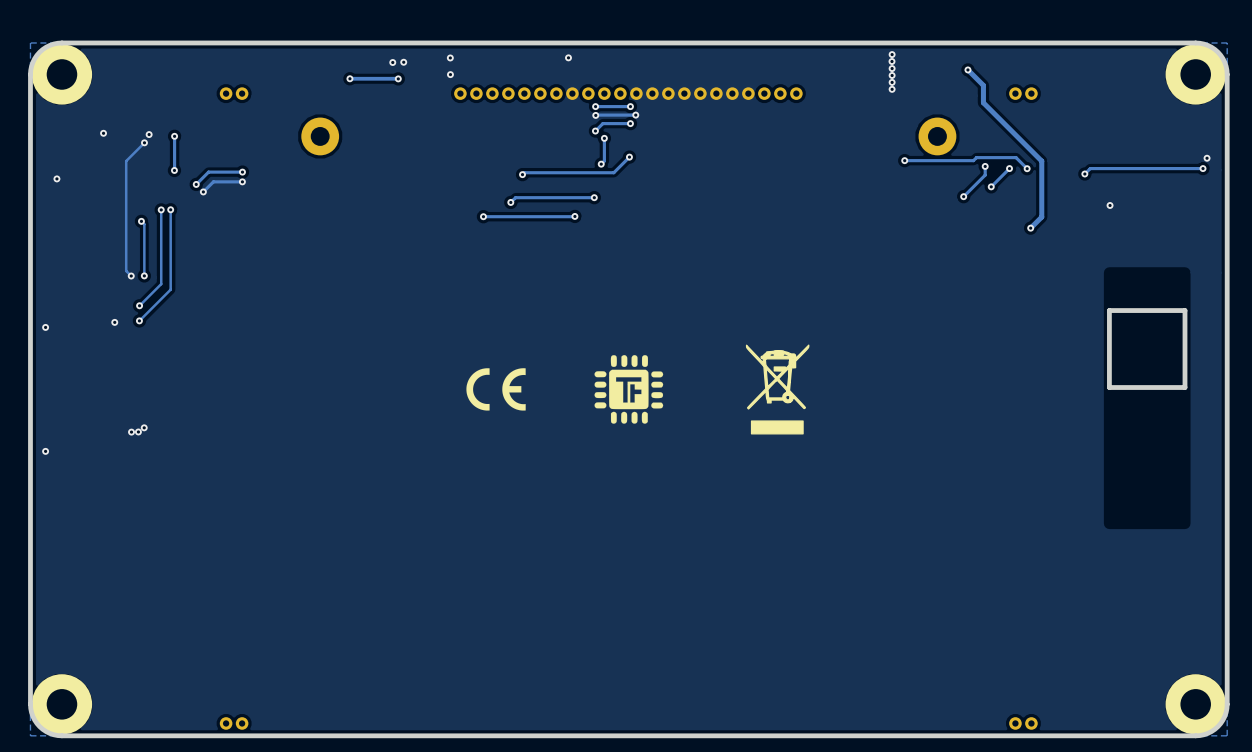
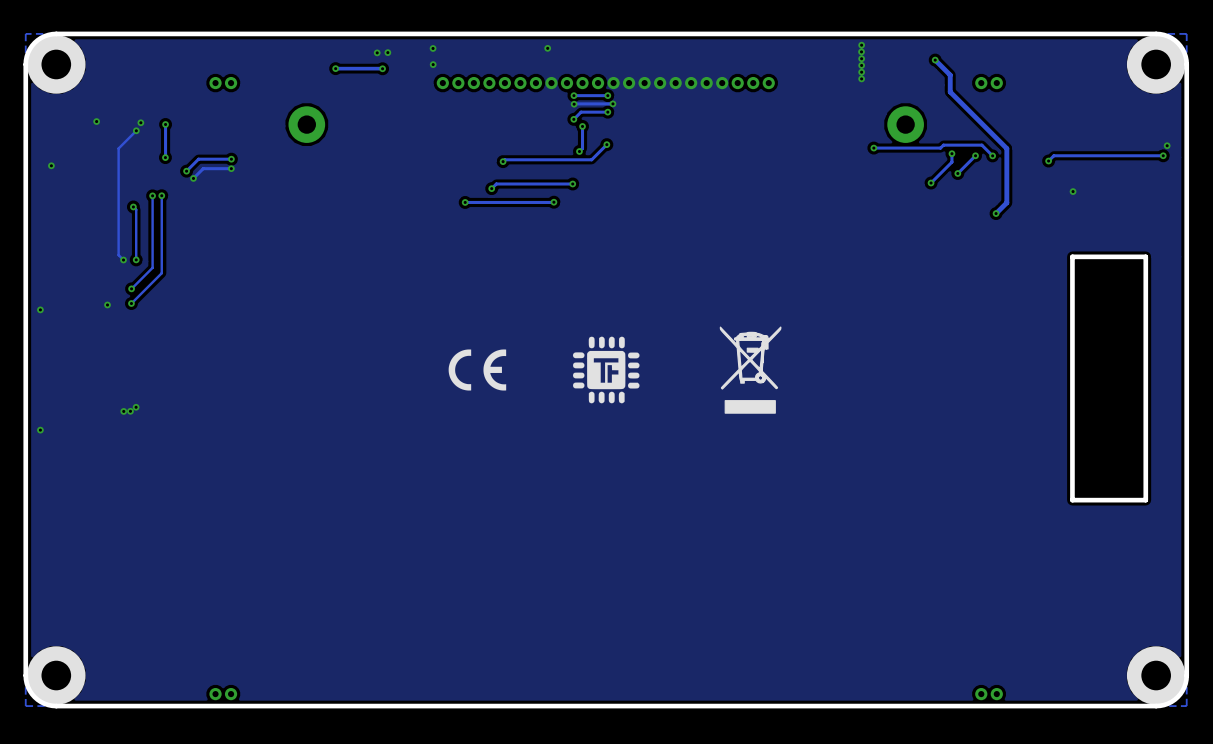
board edge: (1184, 310) (1109, 310) -> (1145, 293) (1145, 256) (1072, 256) (1072, 293)
board edge: (1184, 387) (1109, 387) -> (1145, 368) (1145, 500) (1072, 500) (1072, 368)

